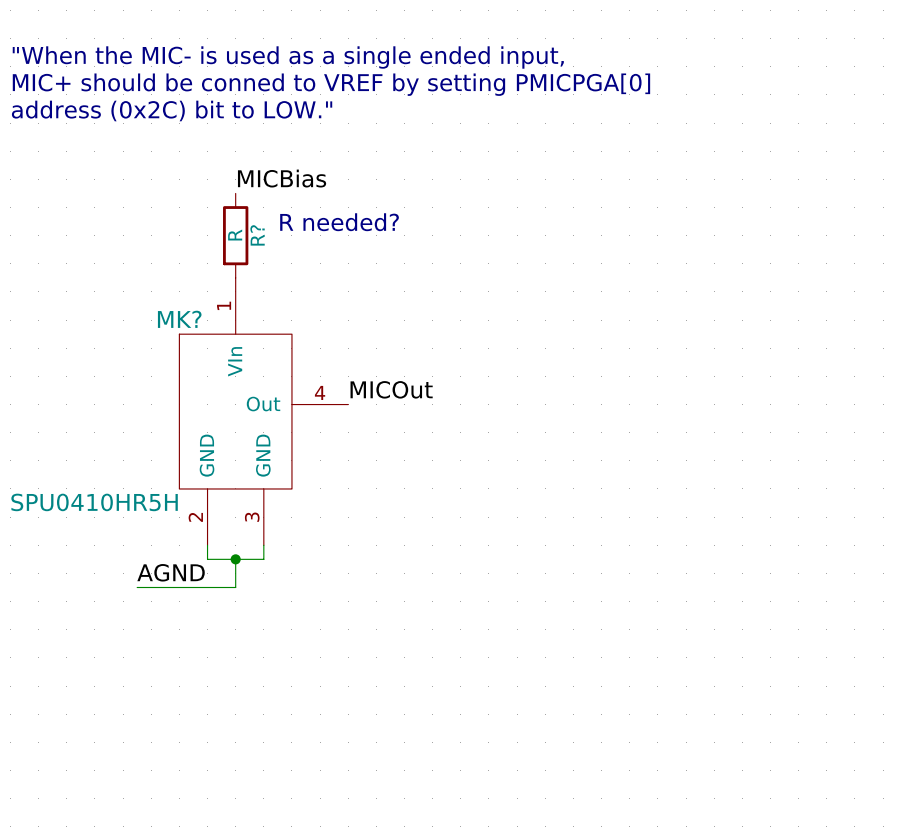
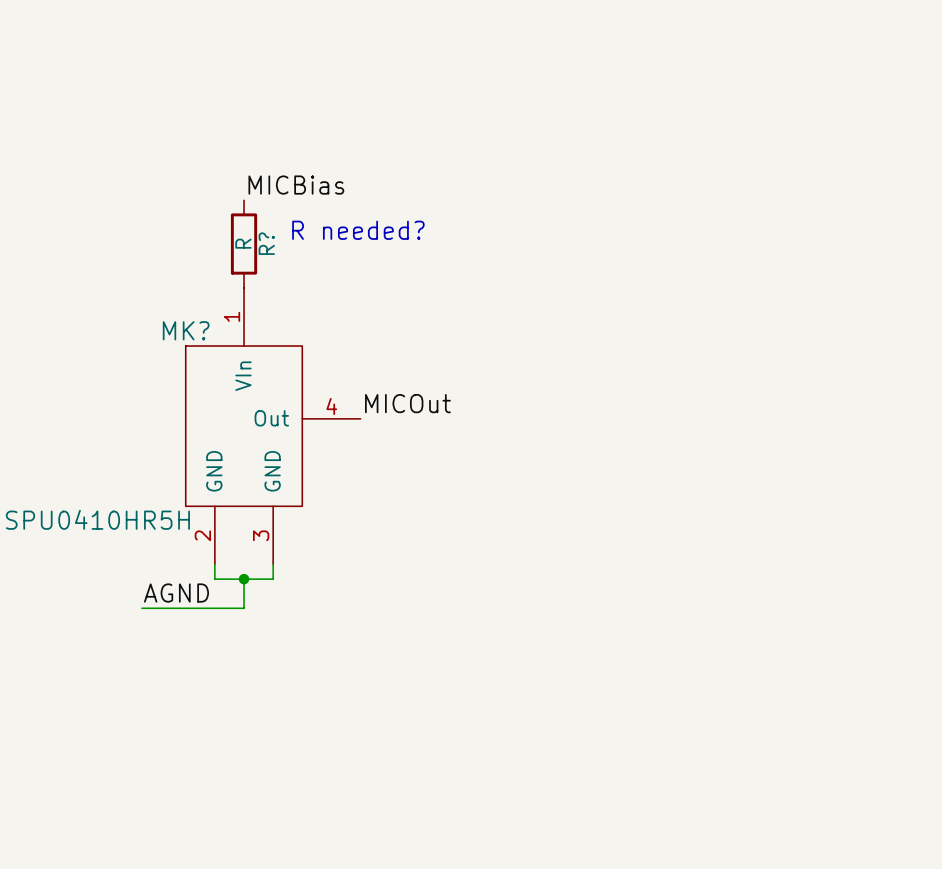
text: "When the MIC- is used as a single ended input, (288, 57) -> none
text: MIC+ should be conned to VREF by setting PMICPGA[0] (331, 84) -> none
text: address (0x2C) bit to LOW." (172, 110) -> none

